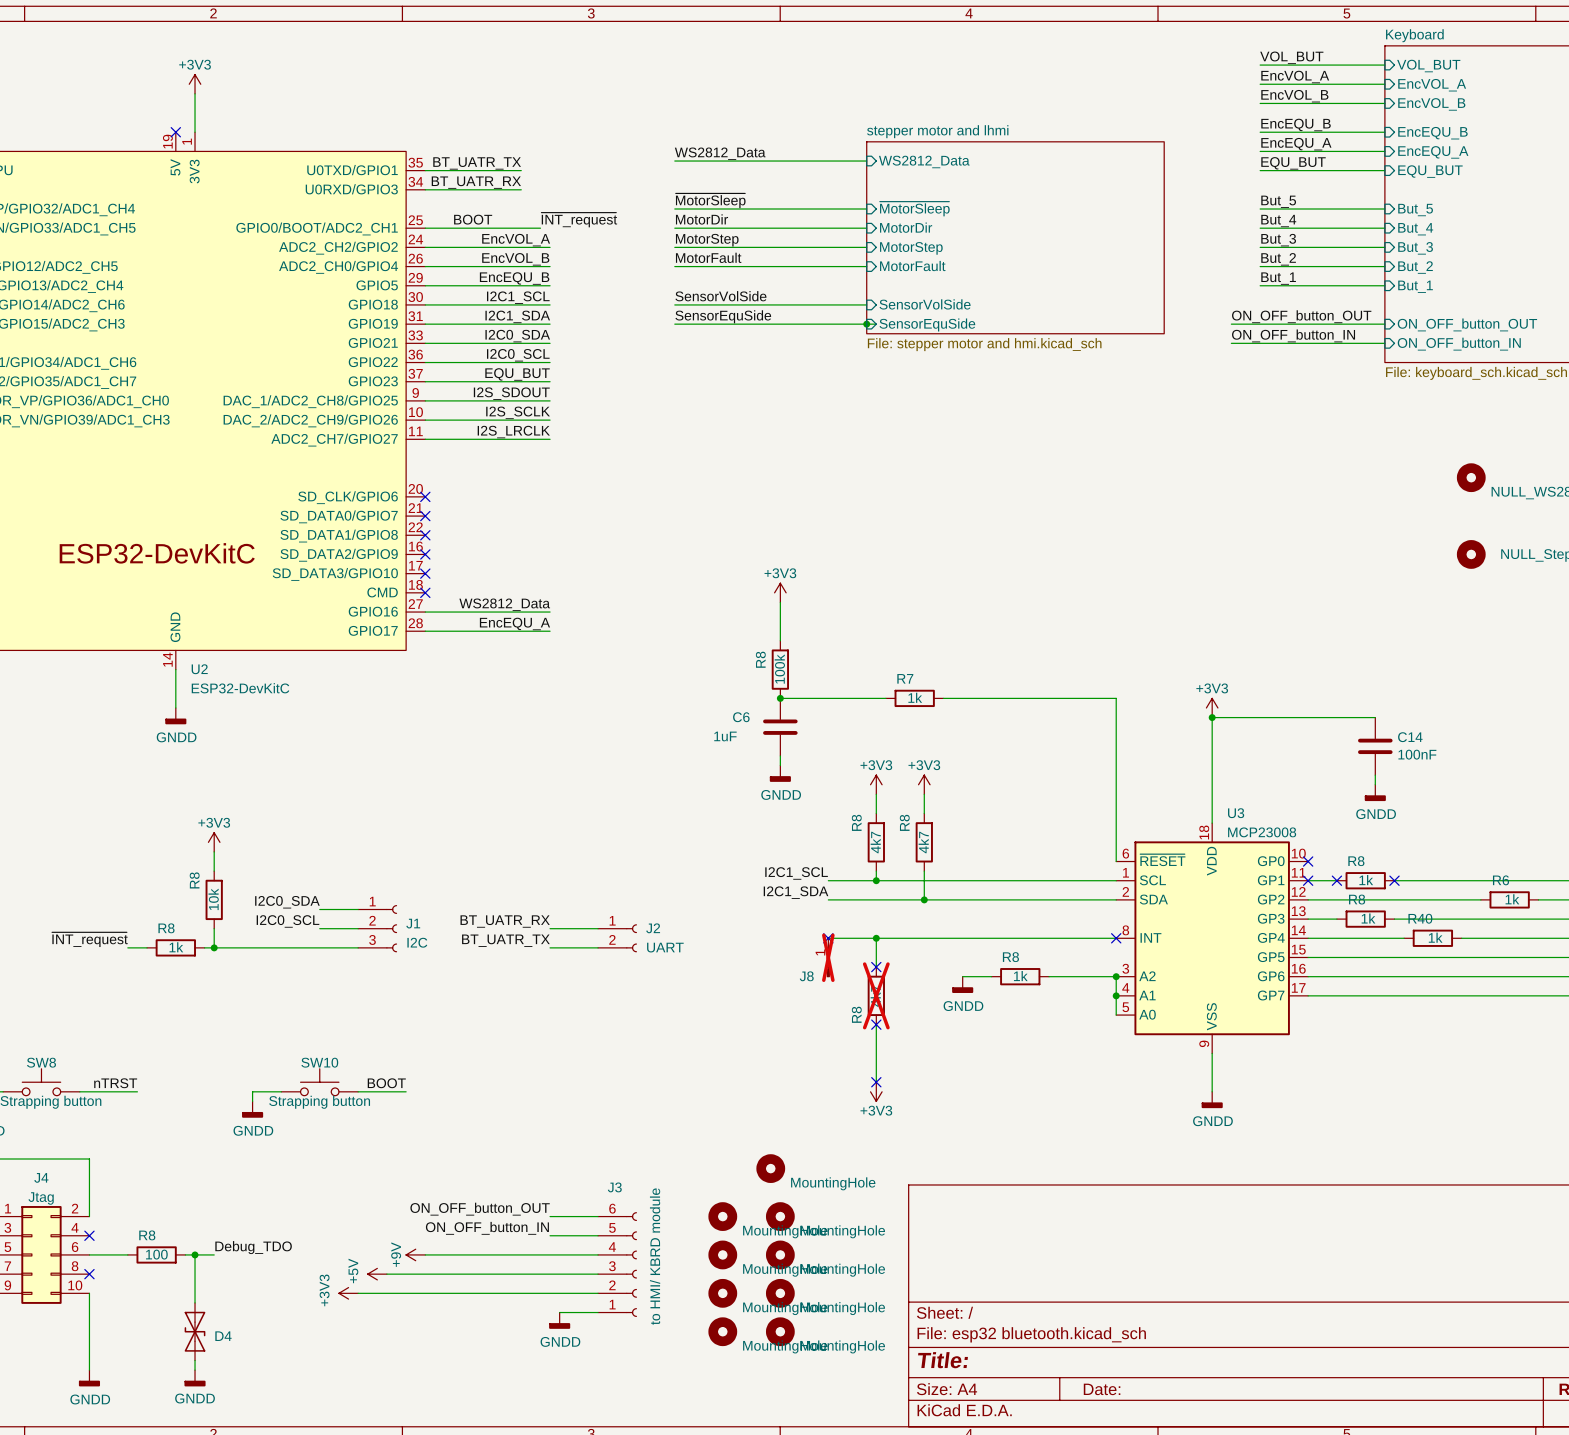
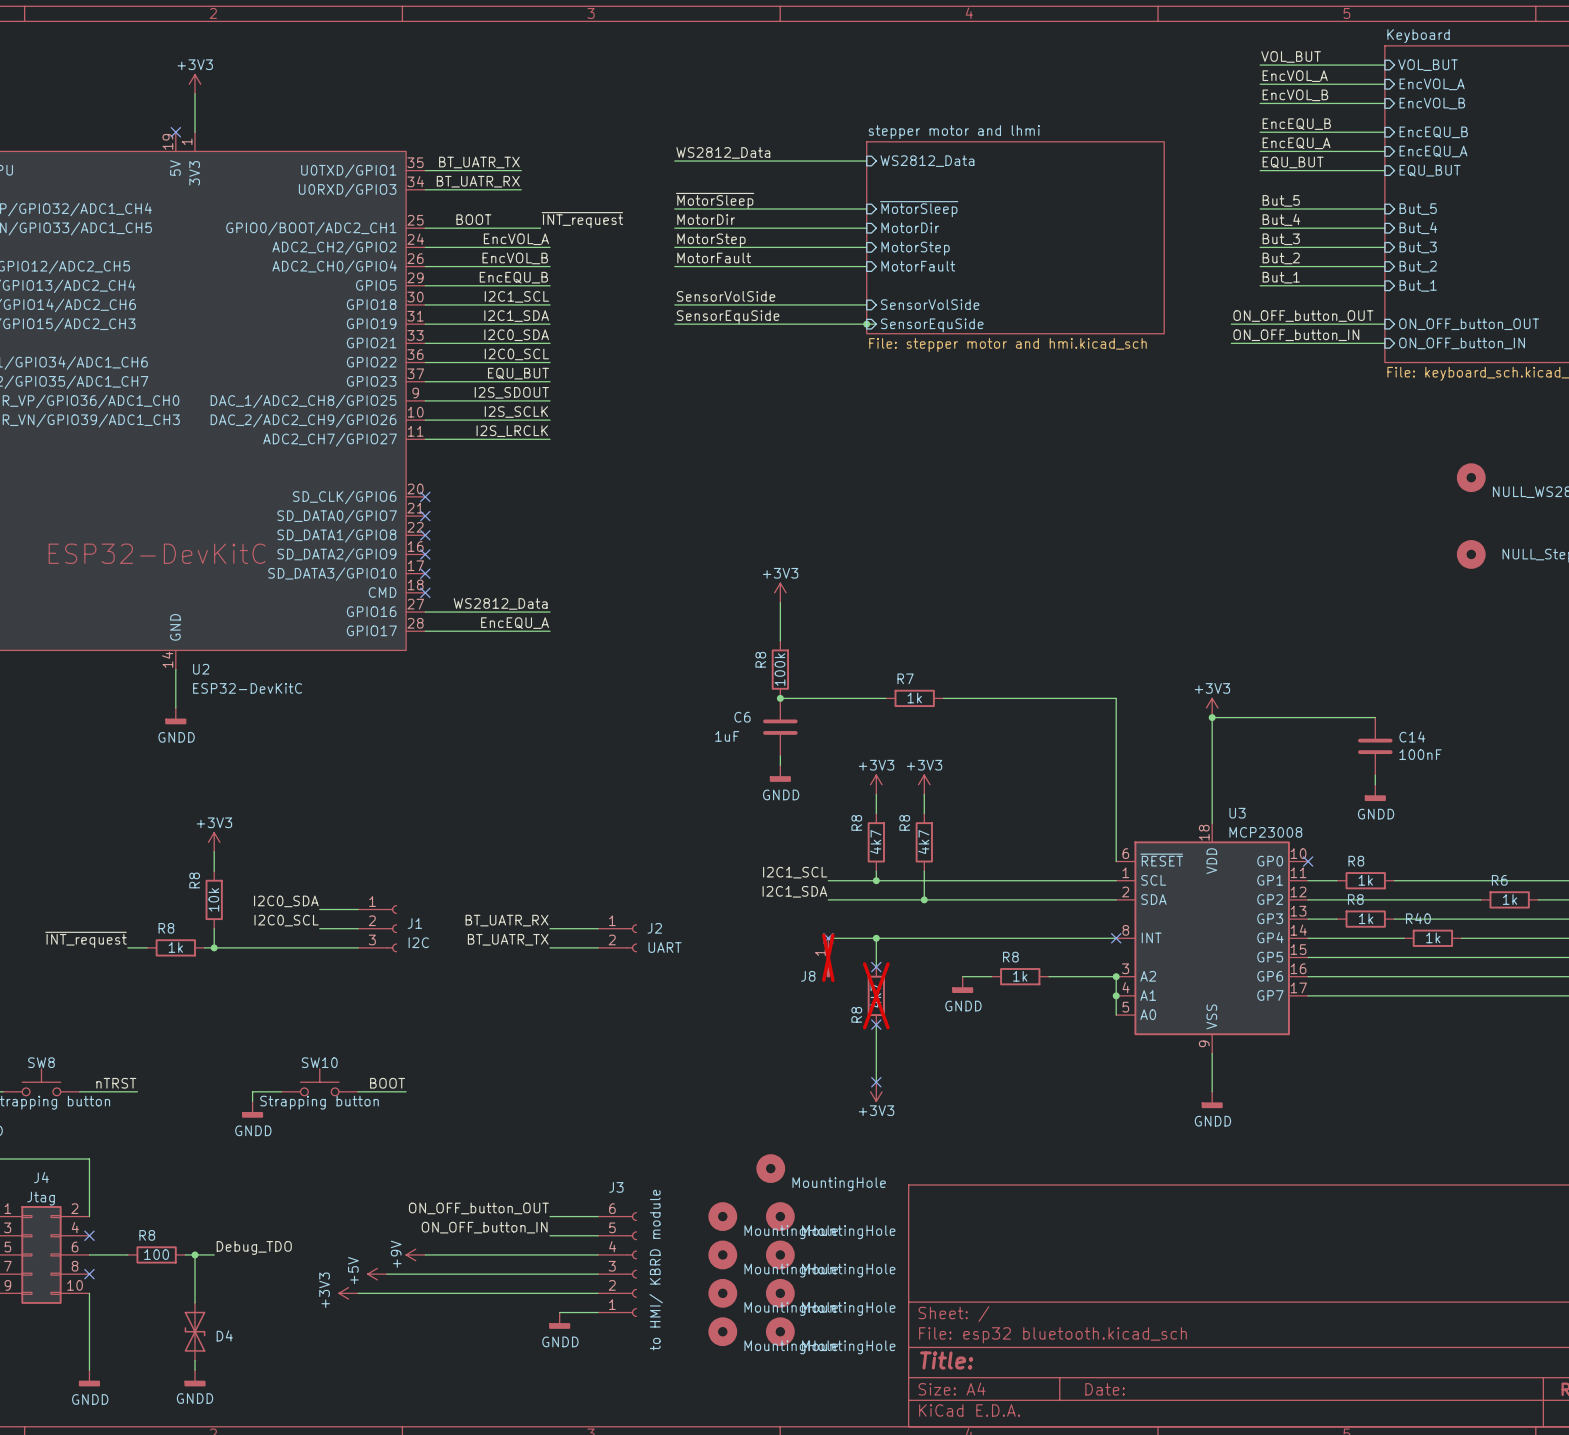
no-connect mark: (1308, 880) -> none
no-connect mark: (1336, 880) -> none
no-connect mark: (1394, 880) -> none

